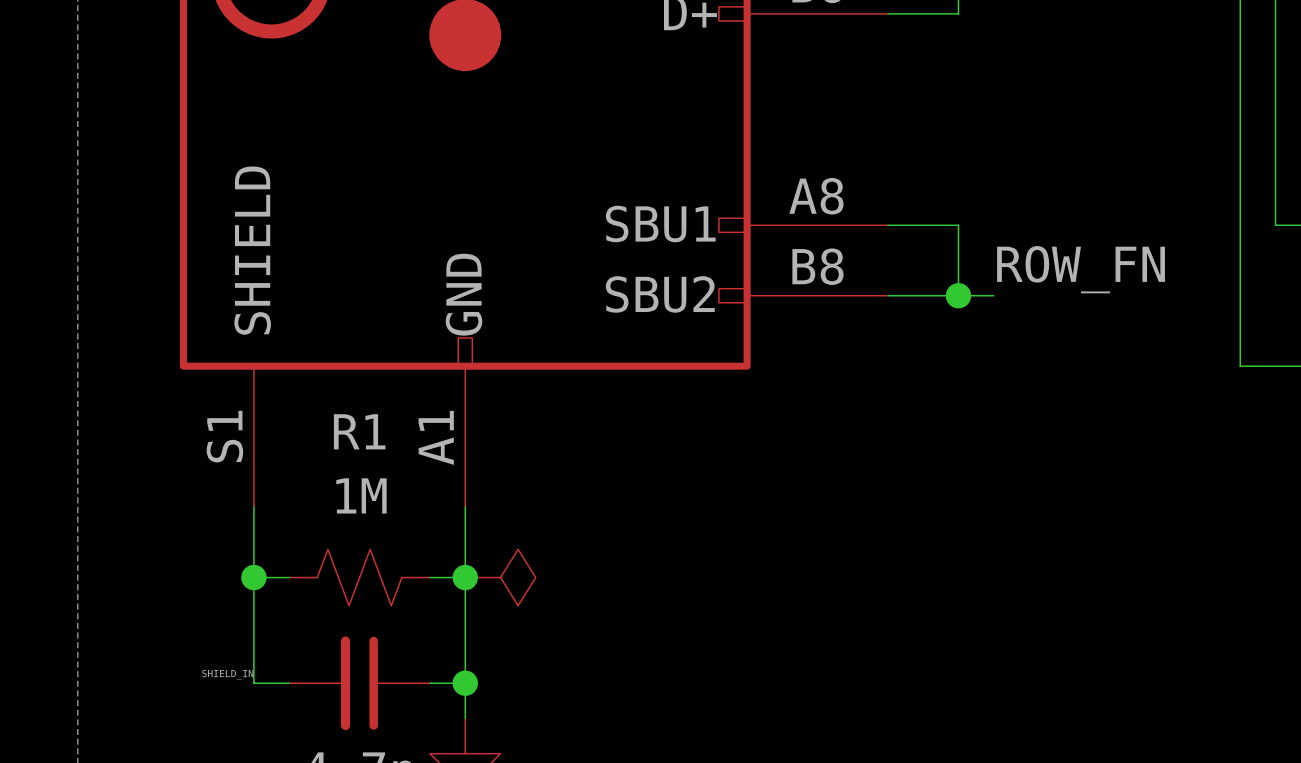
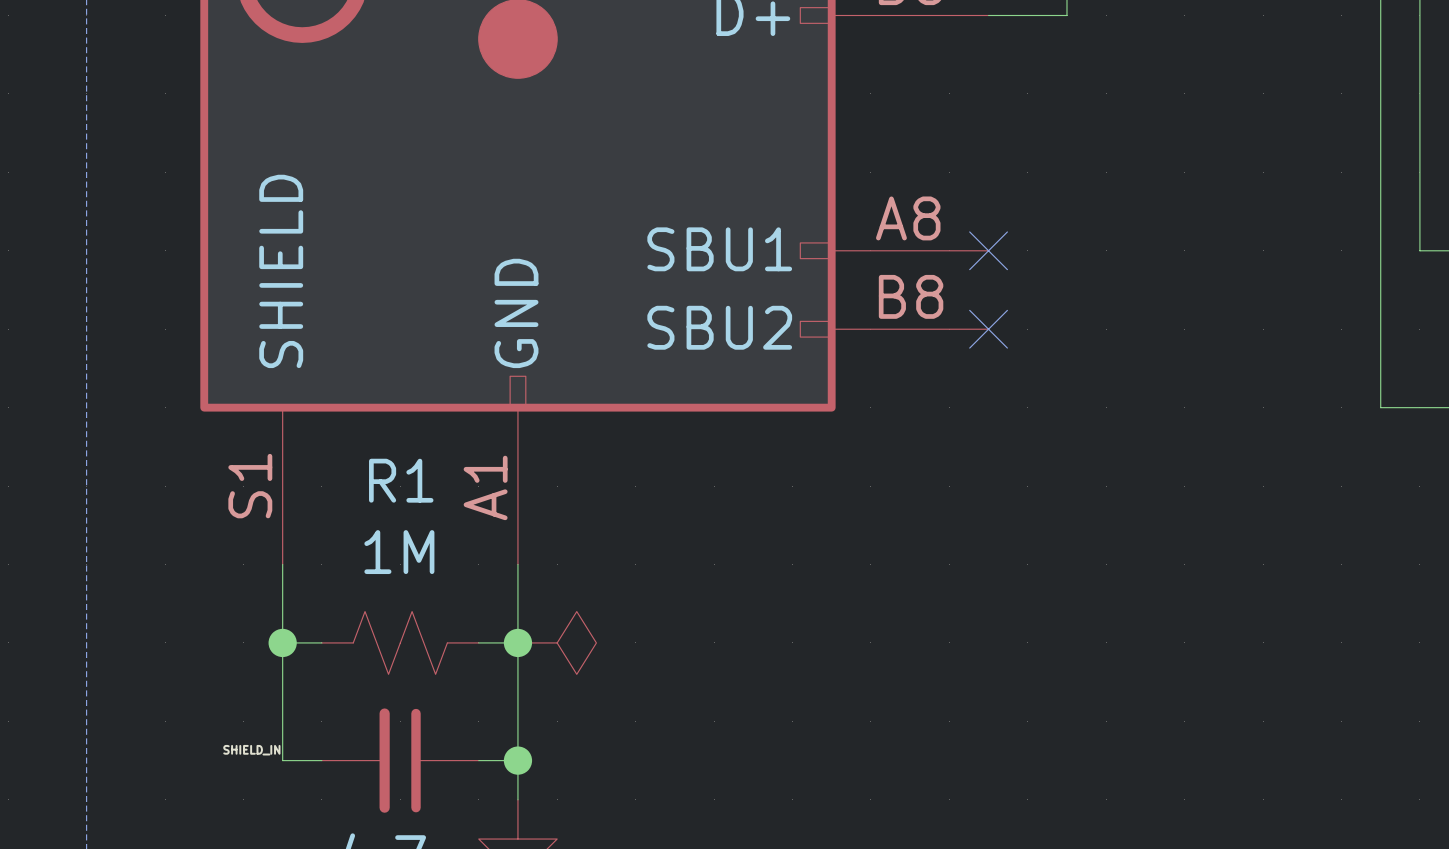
wire: (888, 225) (958, 225) (958, 295) -> none
no-connect mark: none -> (988, 250)
label: ROW_FN (1081, 269) -> none
wire: (888, 295) (993, 295) -> none
no-connect mark: none -> (988, 329)
junction: (958, 295) -> none

